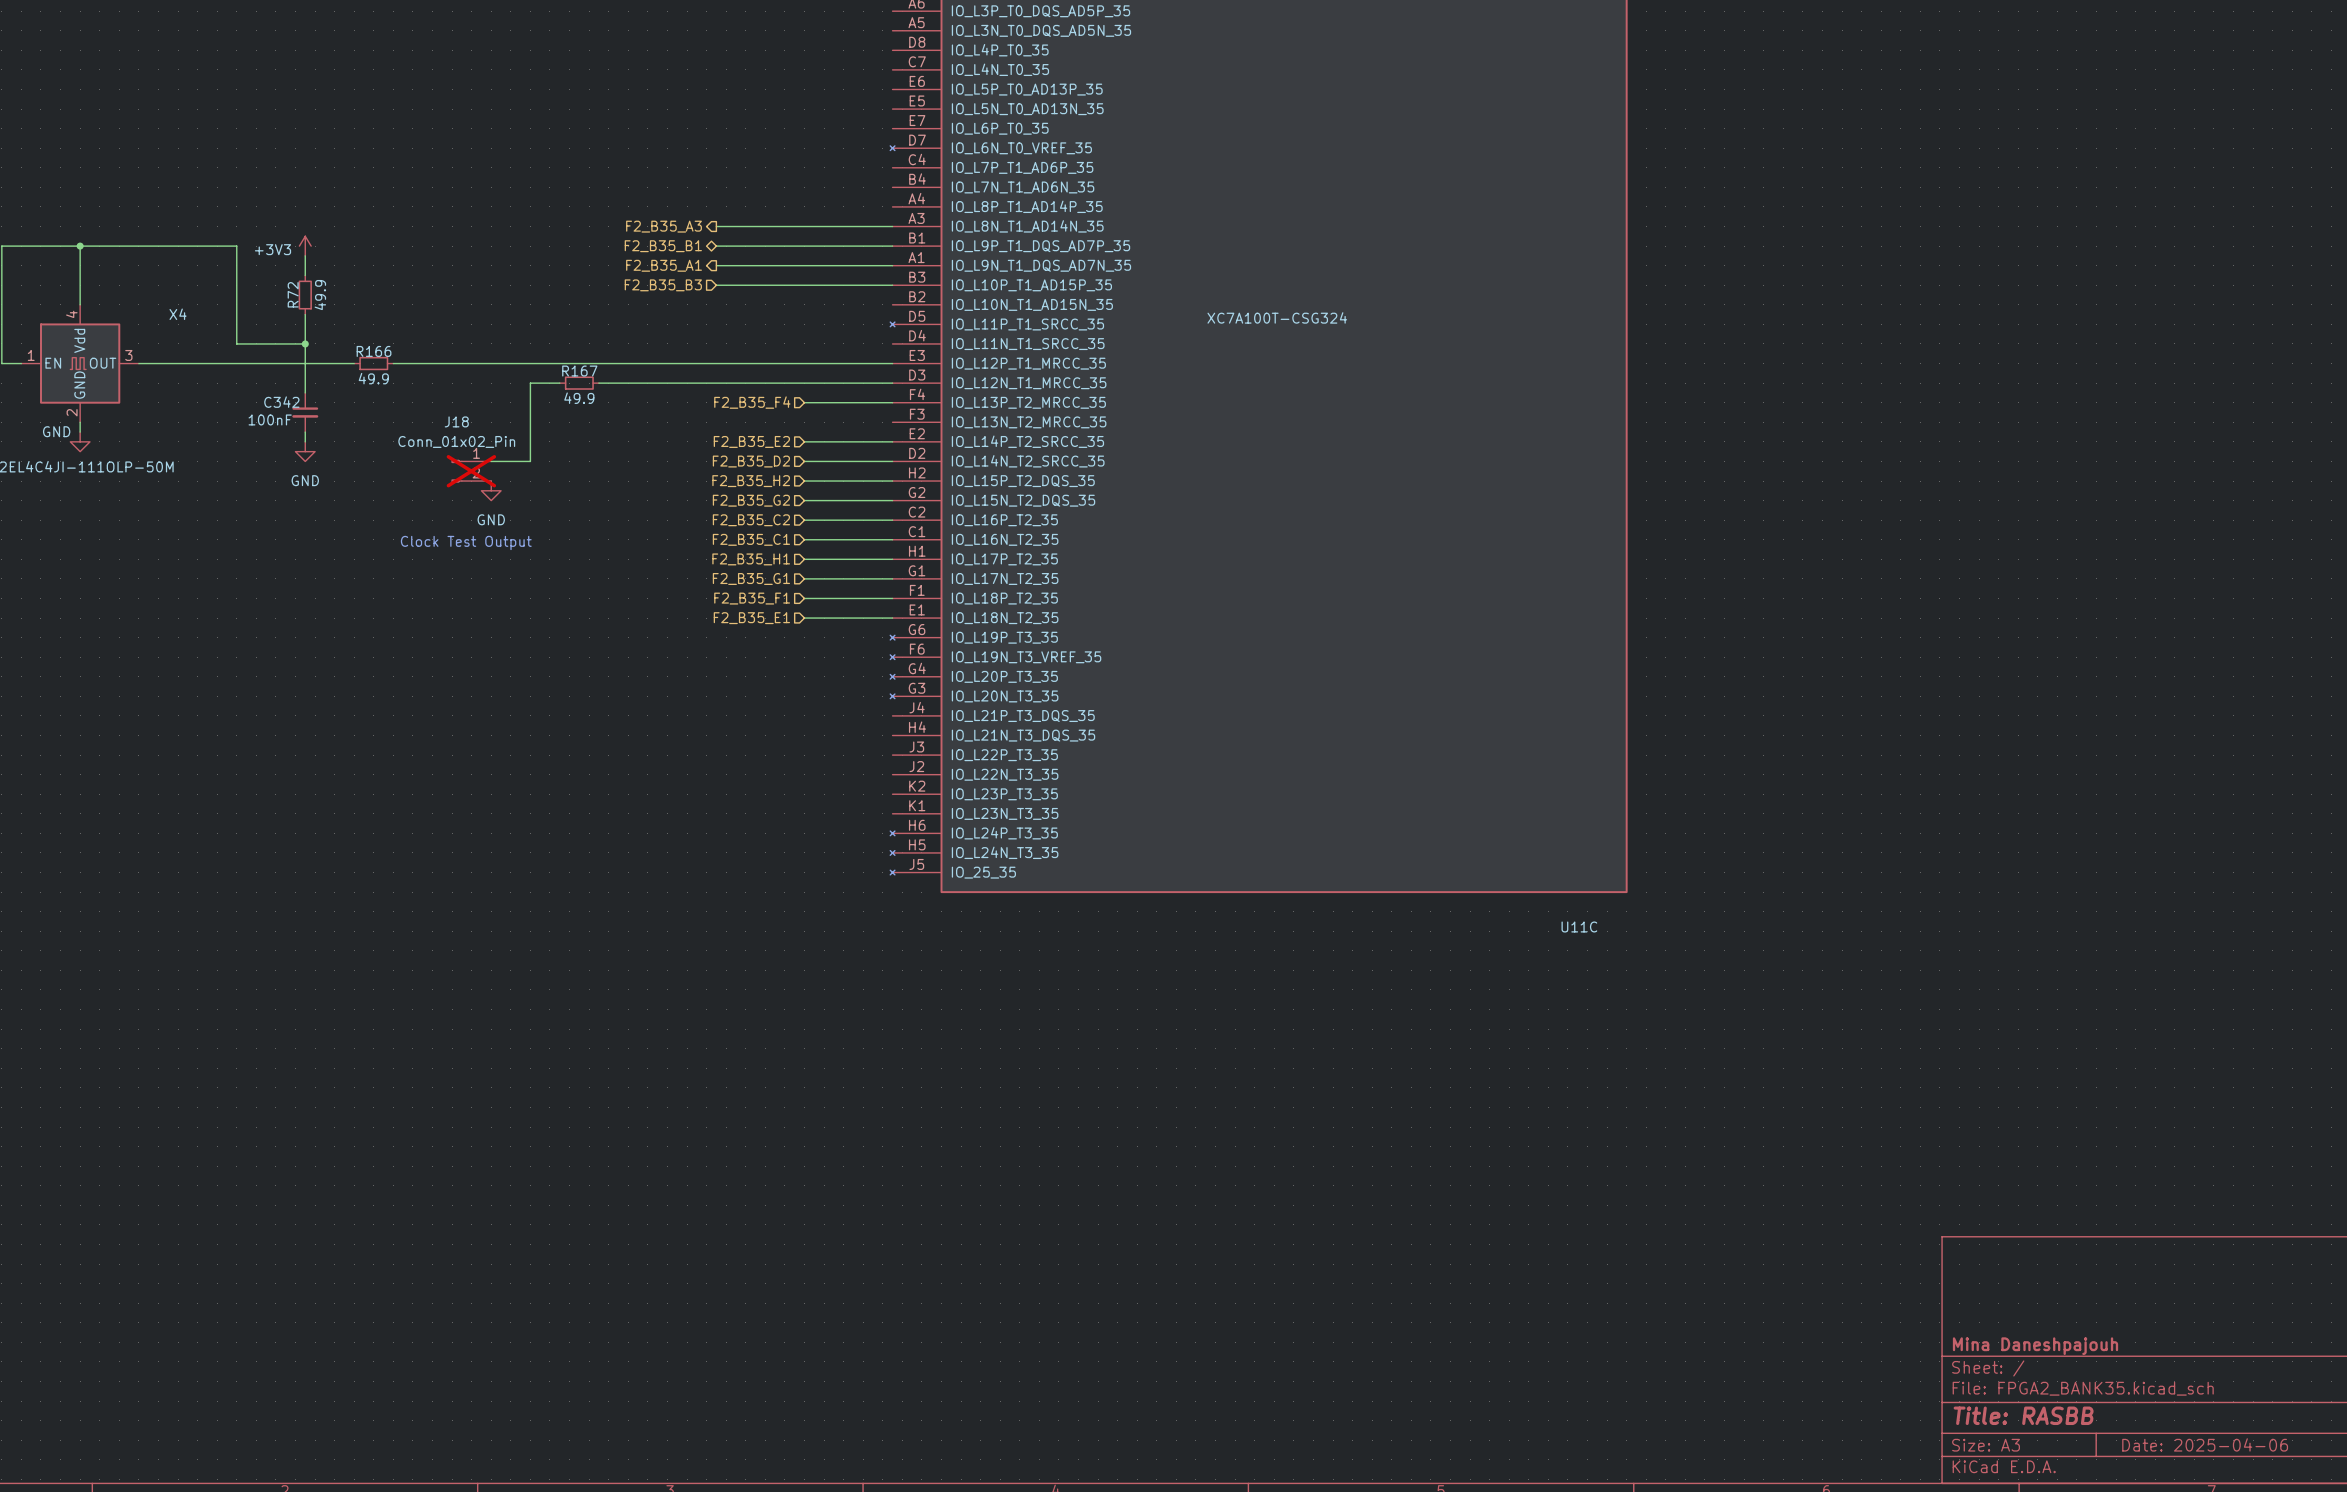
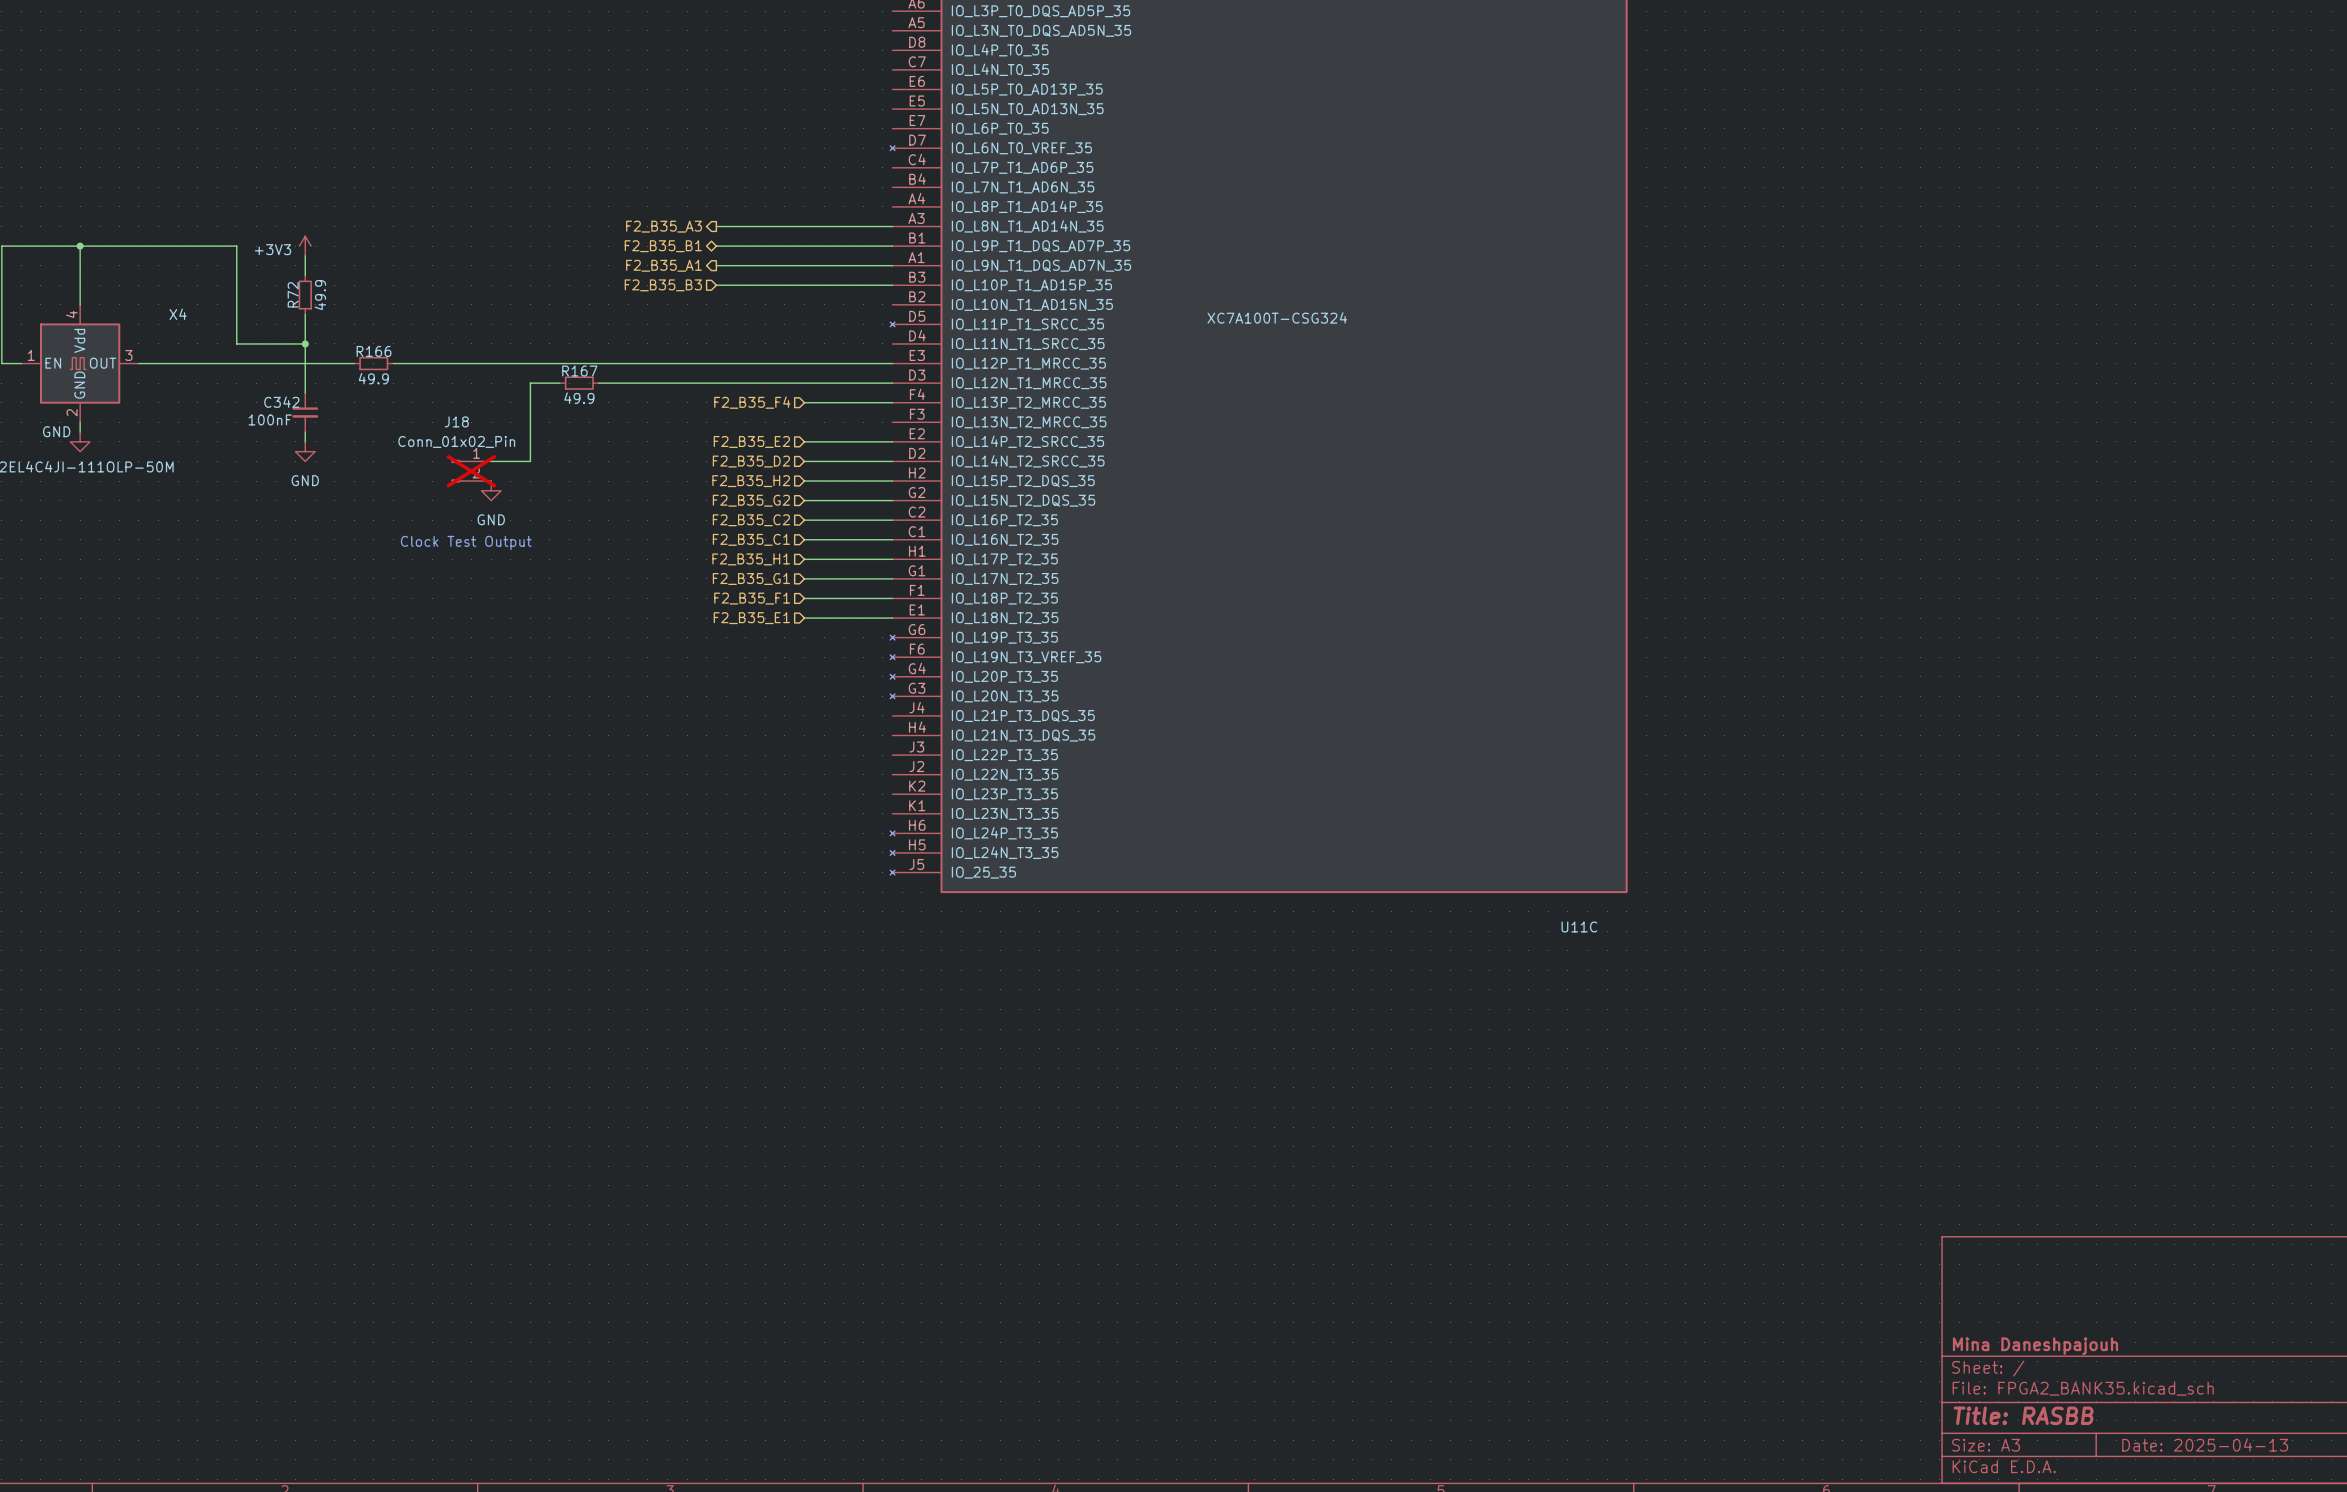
title block: Date: 2025-04-06 (2205, 1444) -> Date: 2025-04-13 (2205, 1444)

